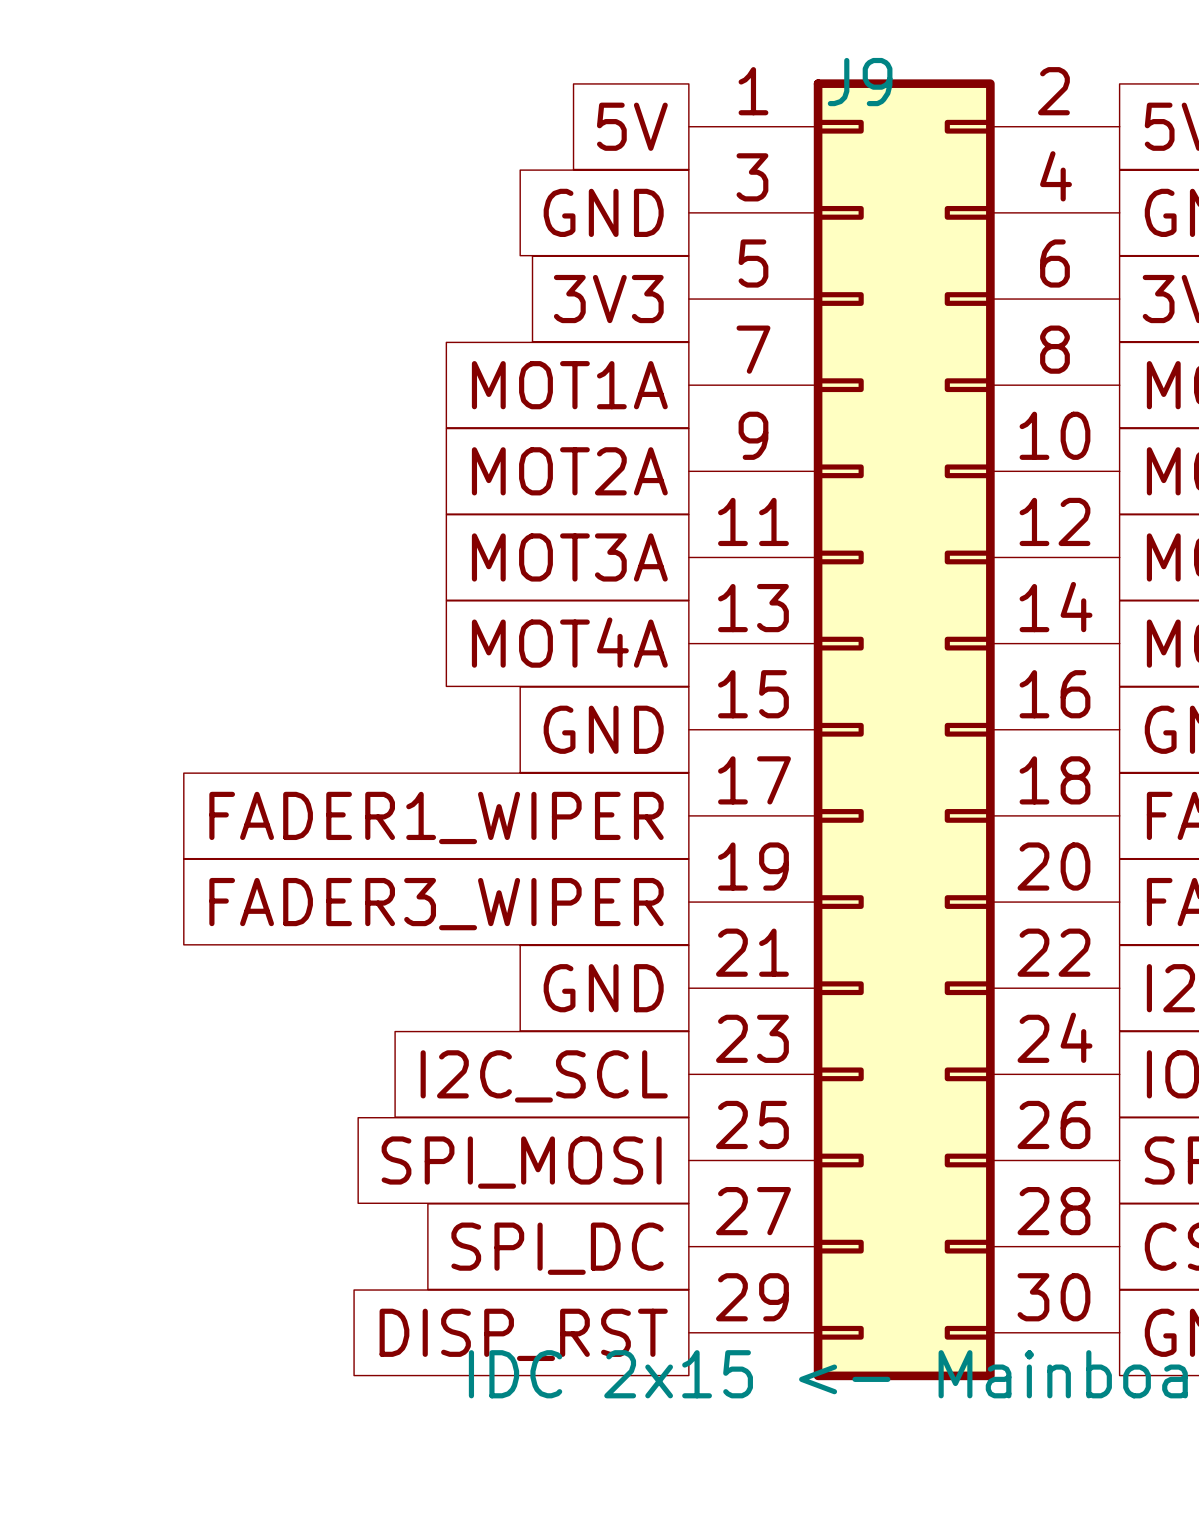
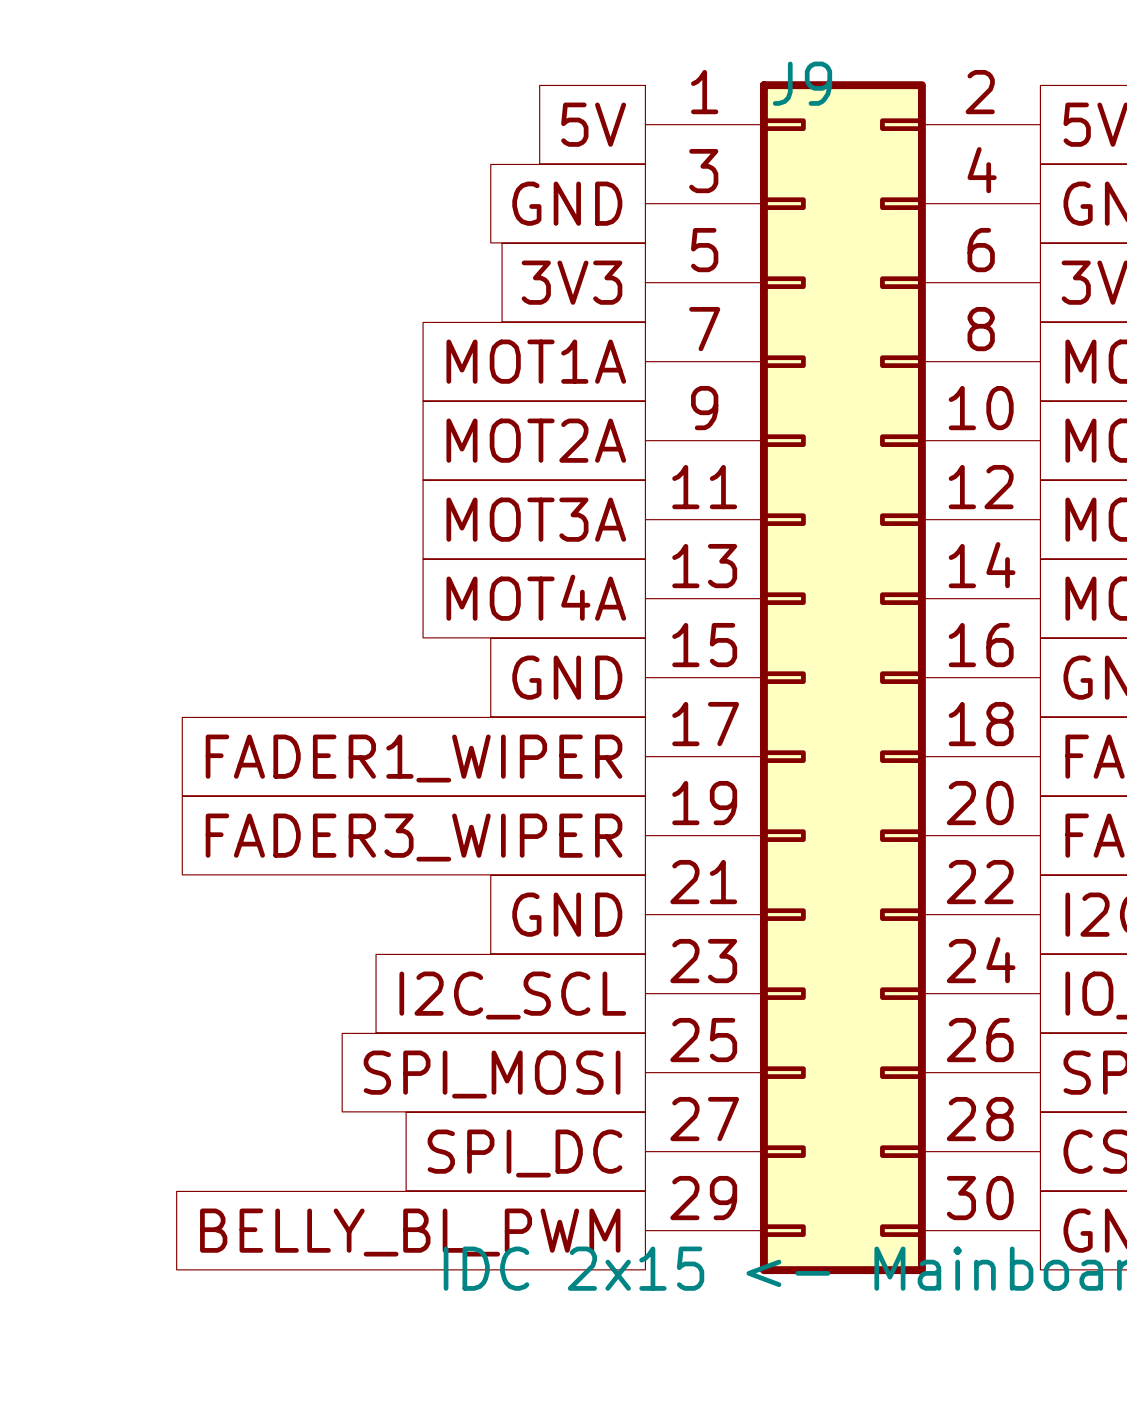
global label: DISP_RST (523, 1334) -> BELLY_BL_PWM (410, 1232)

